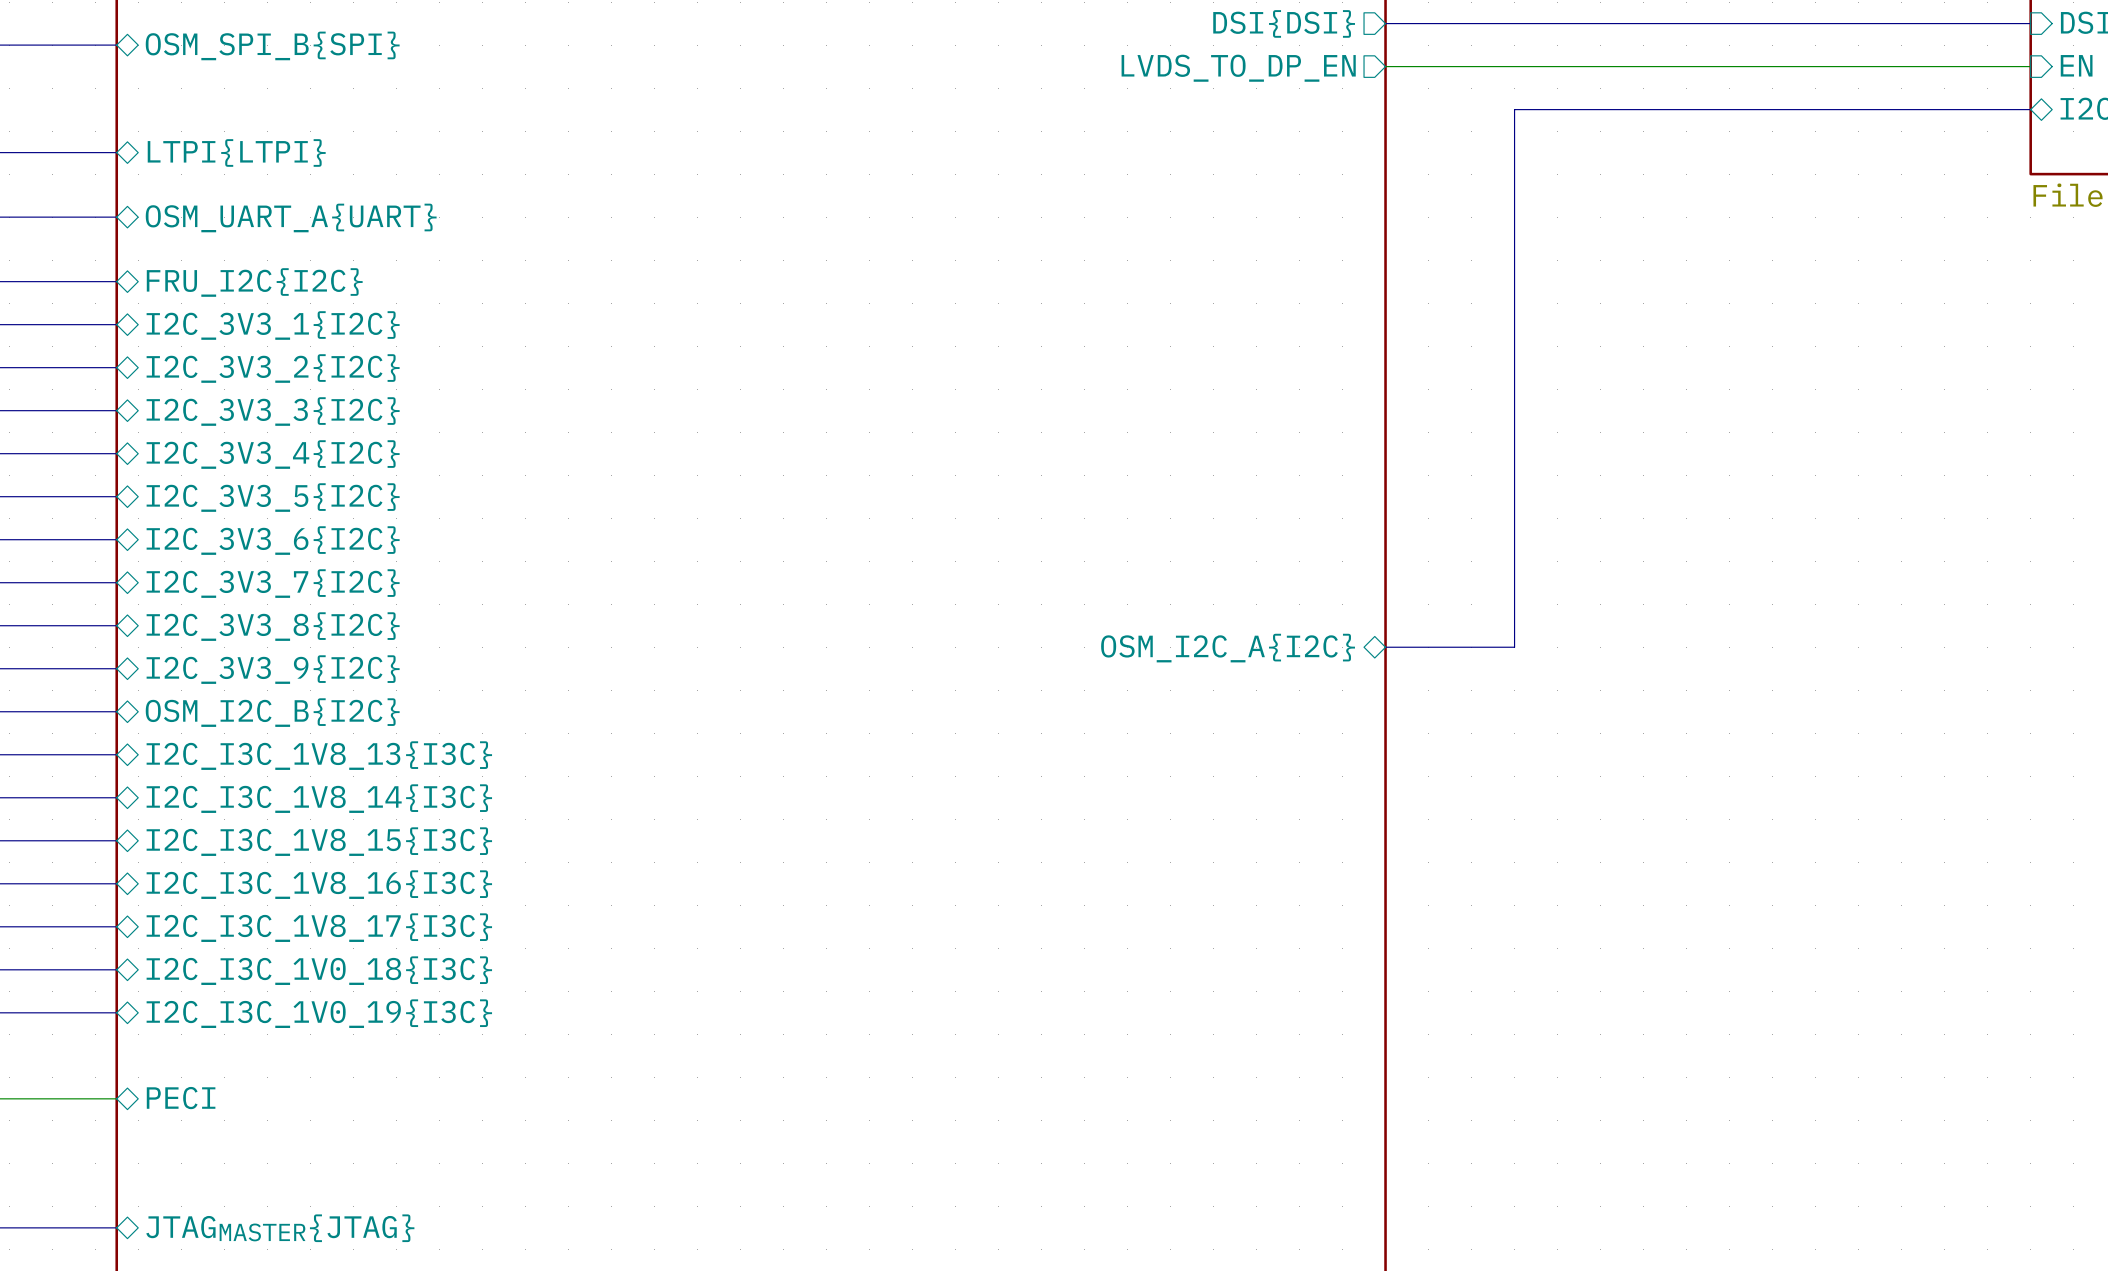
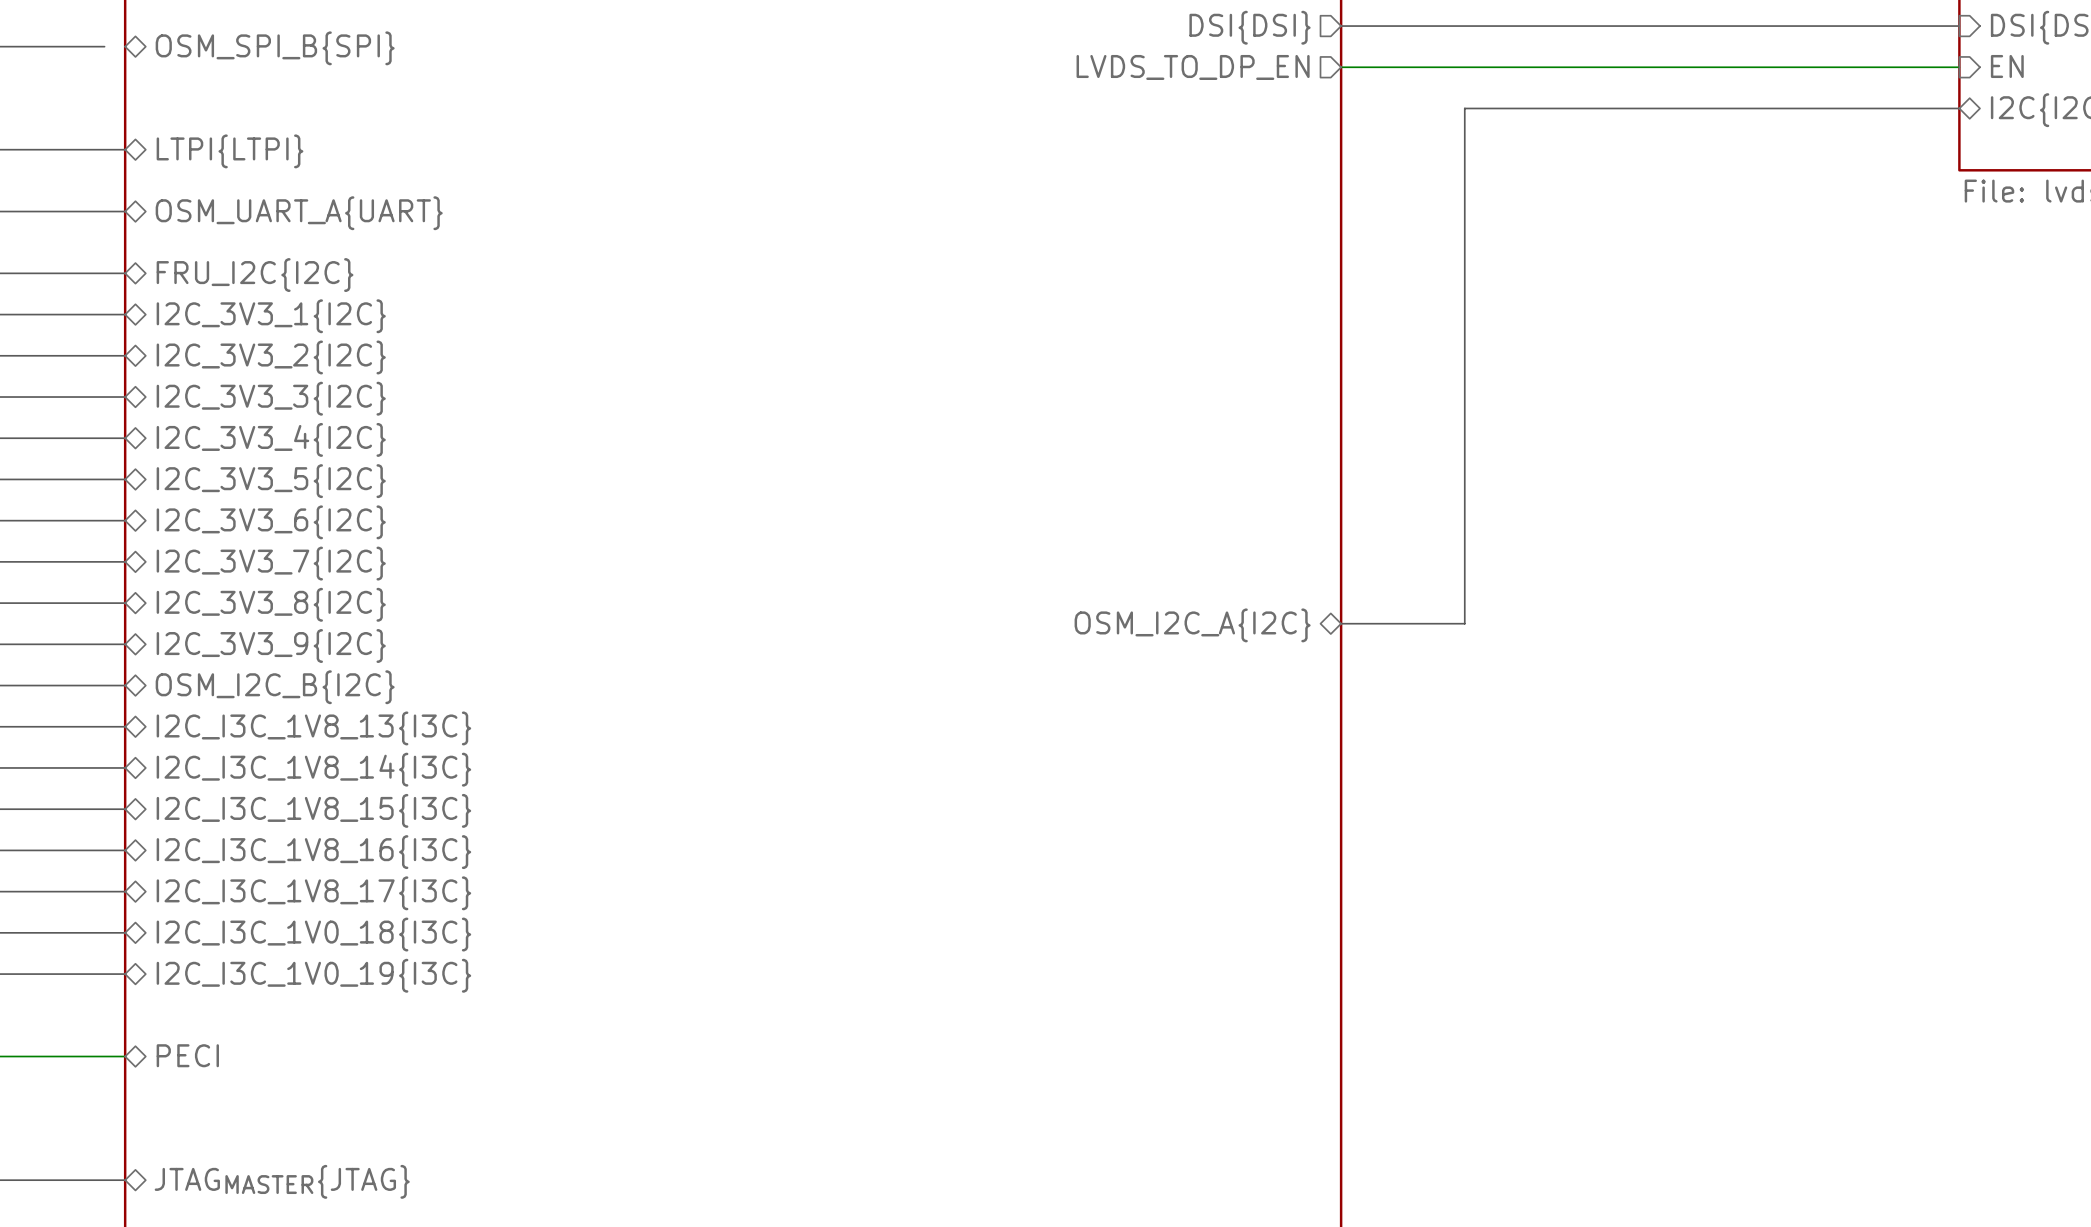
bus: (95, 45) (116, 45) -> none

